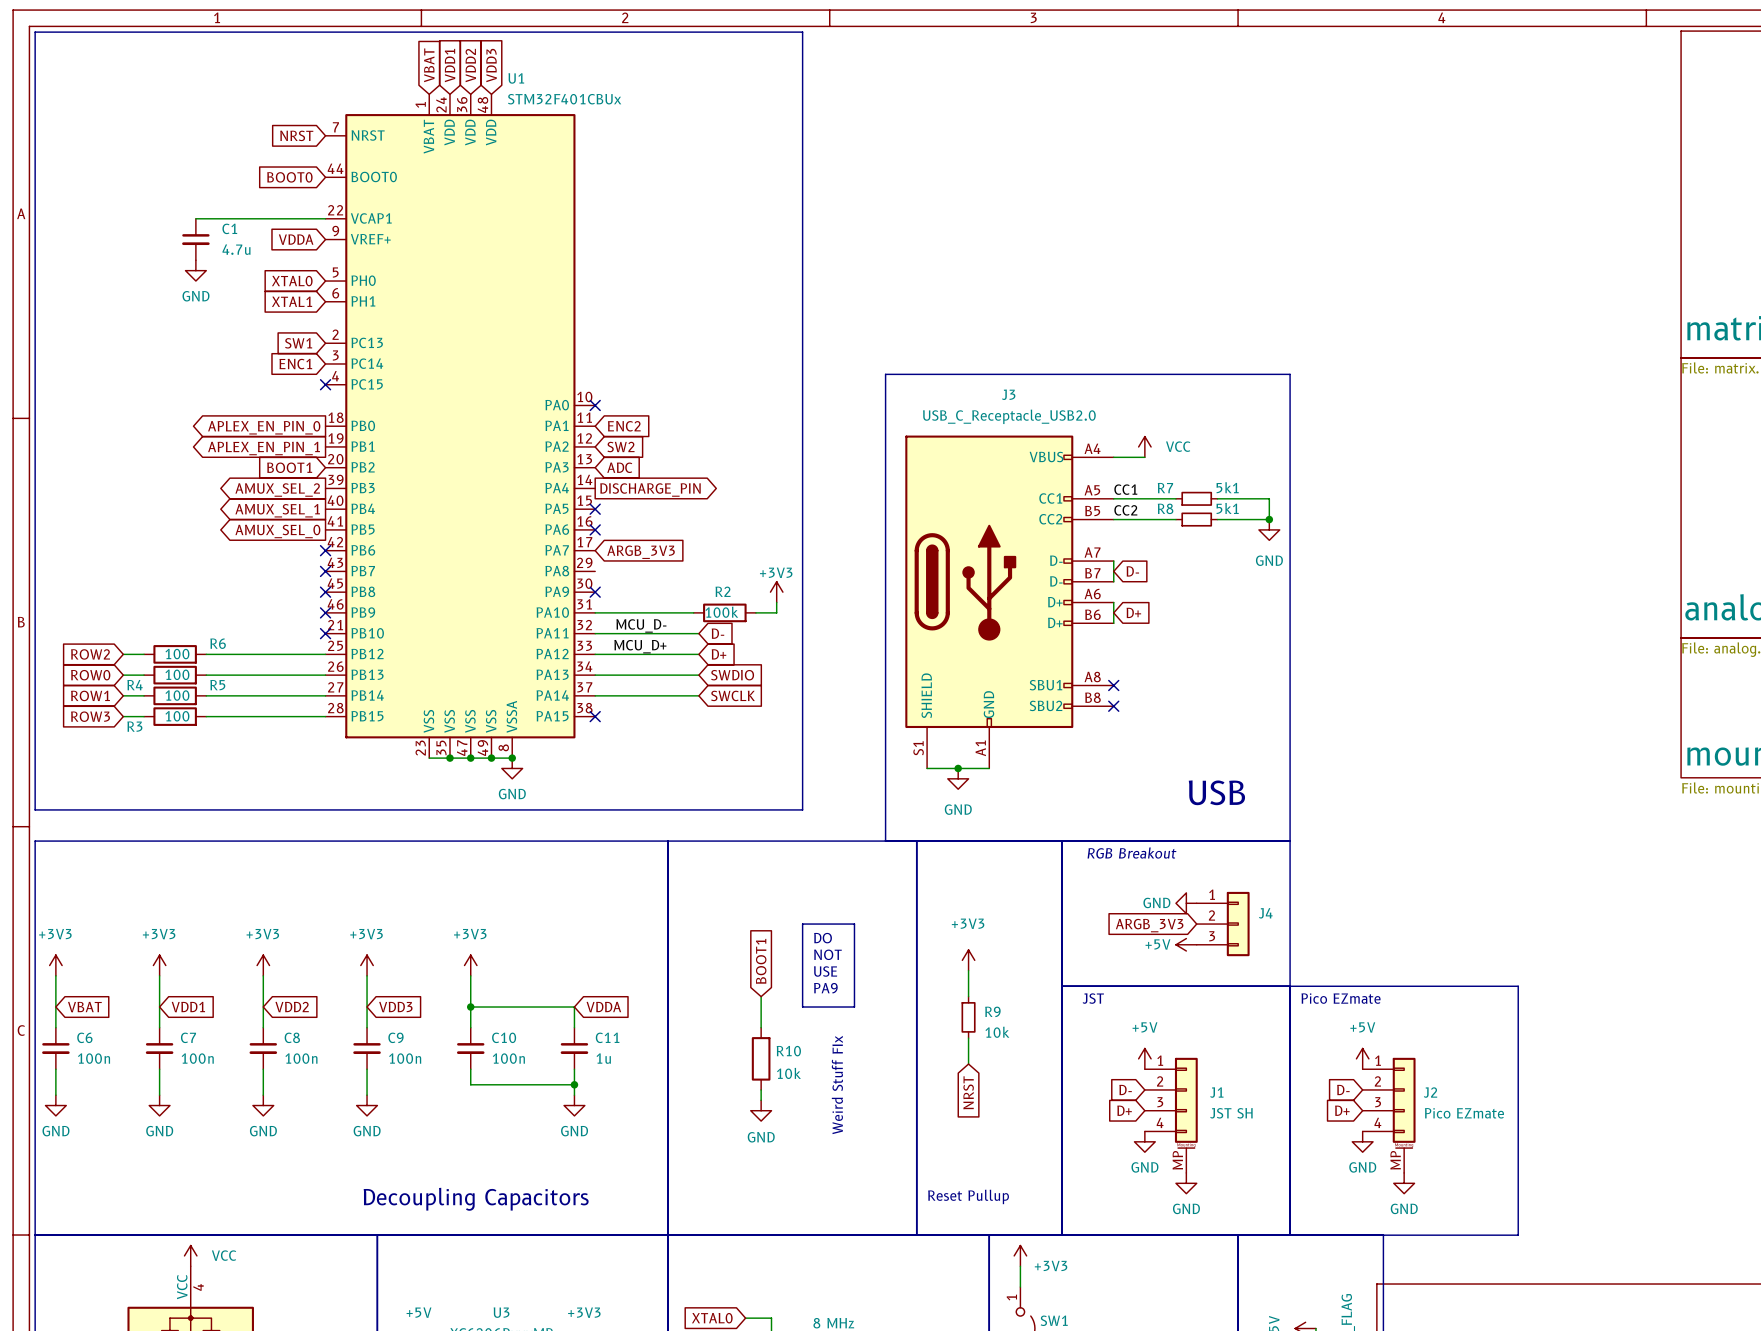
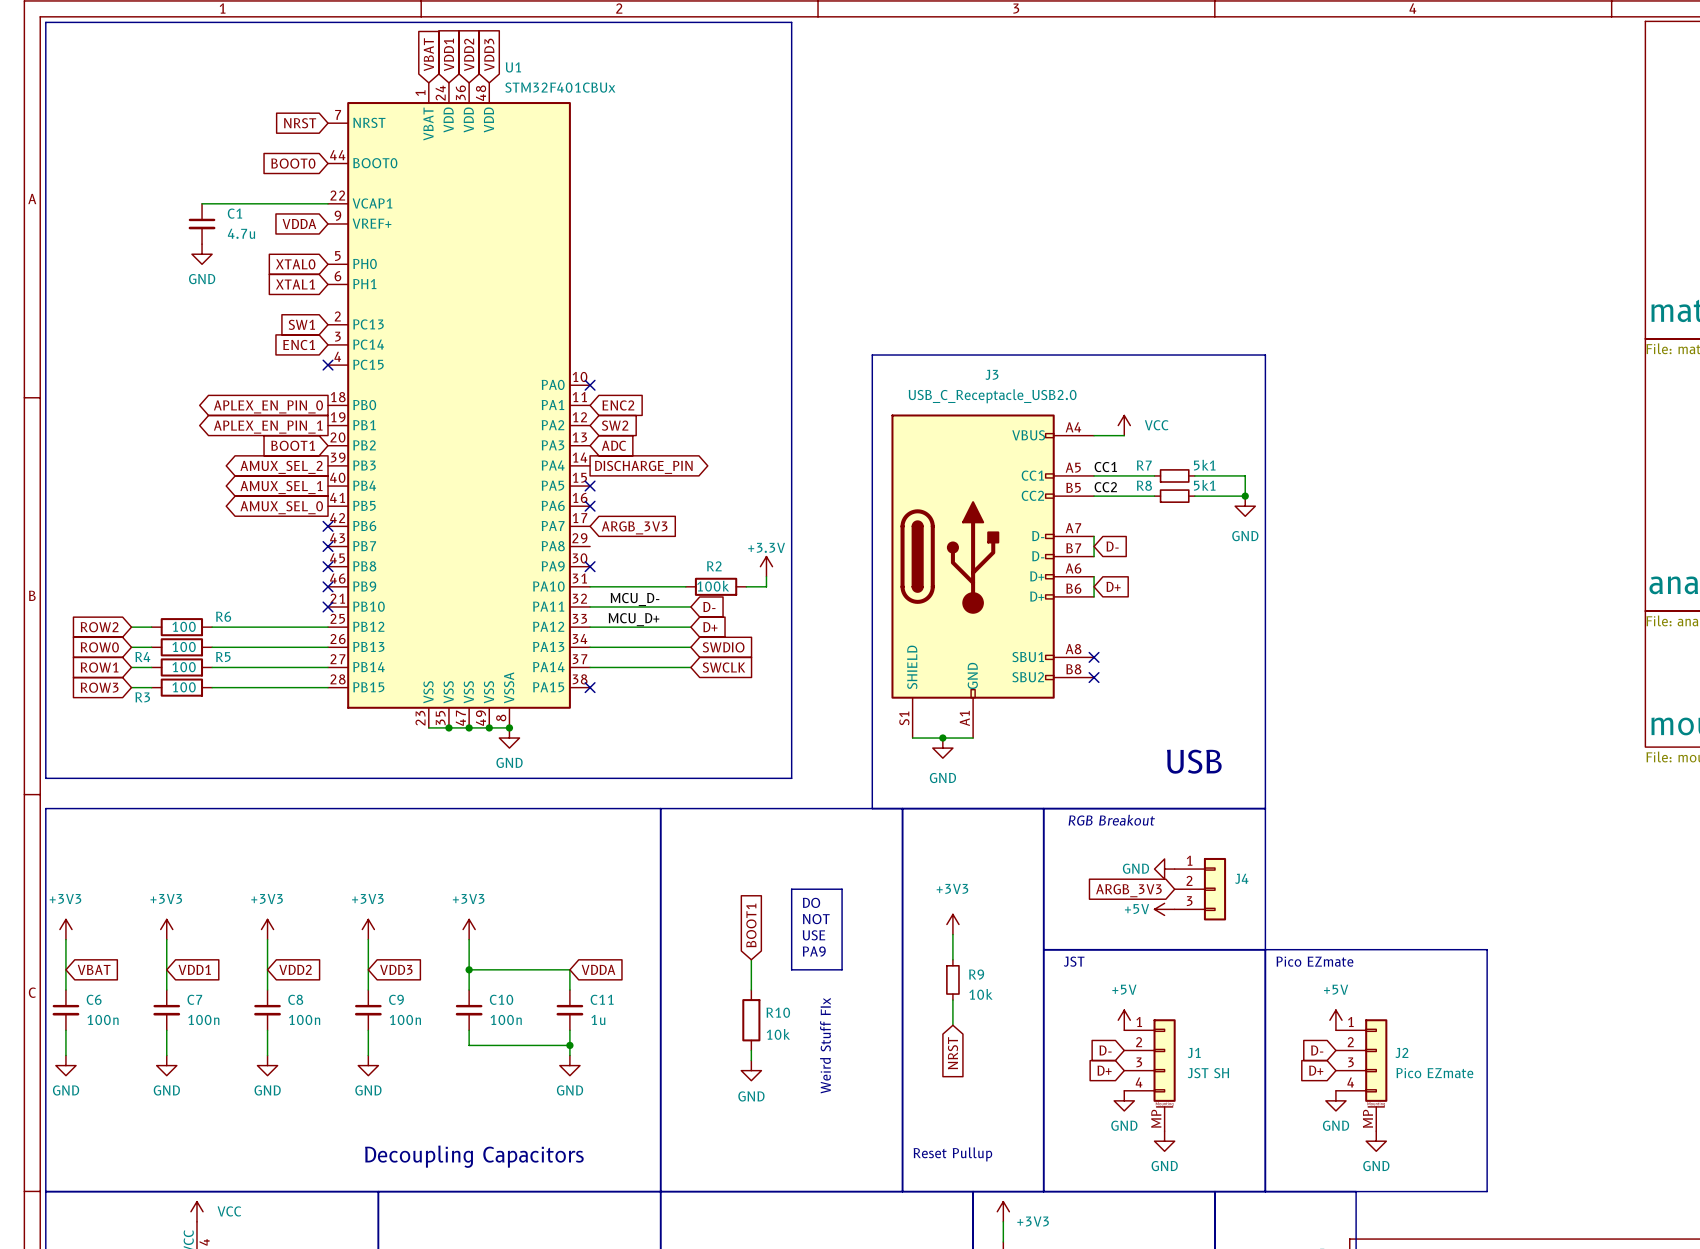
power symbol: +3V3 (776, 592) -> +3.3V (766, 566)

